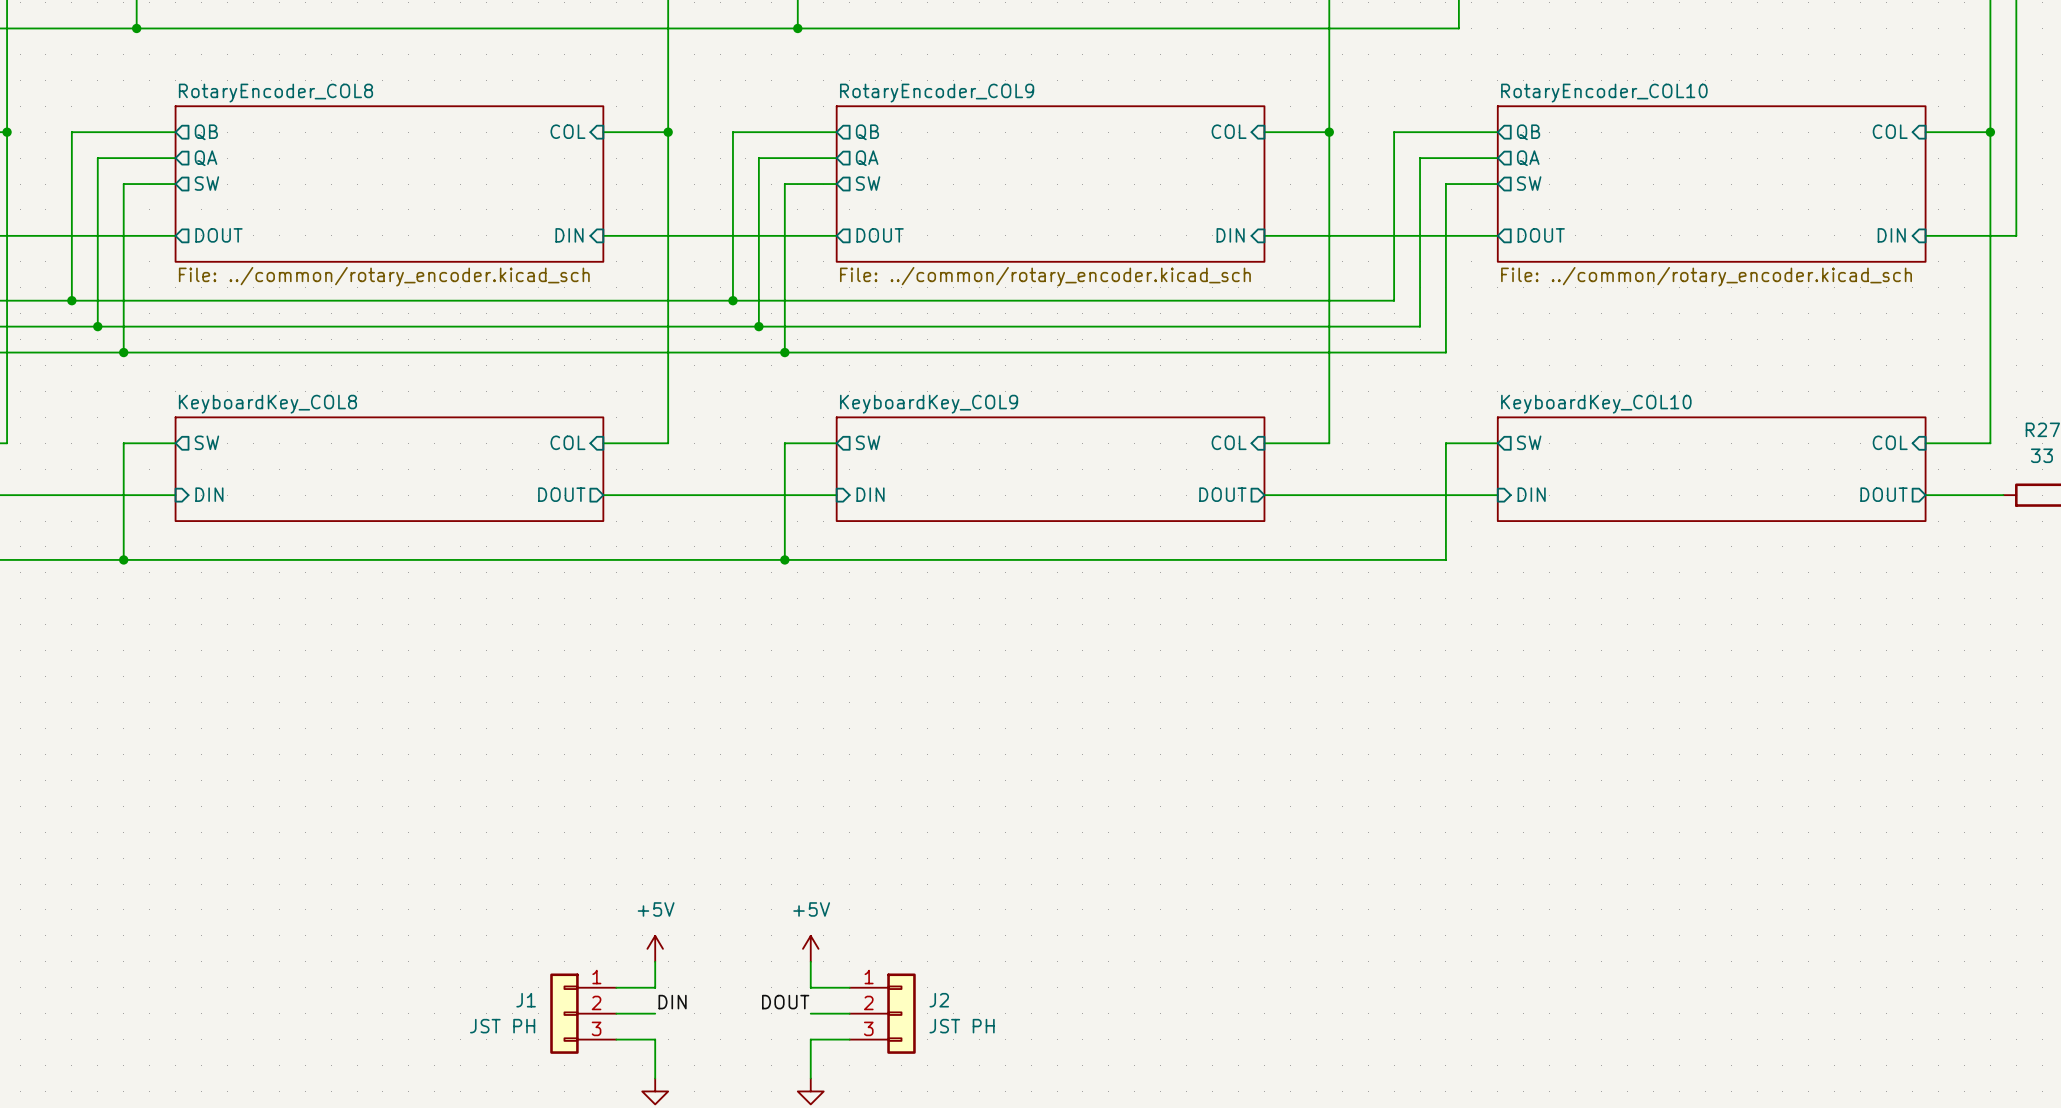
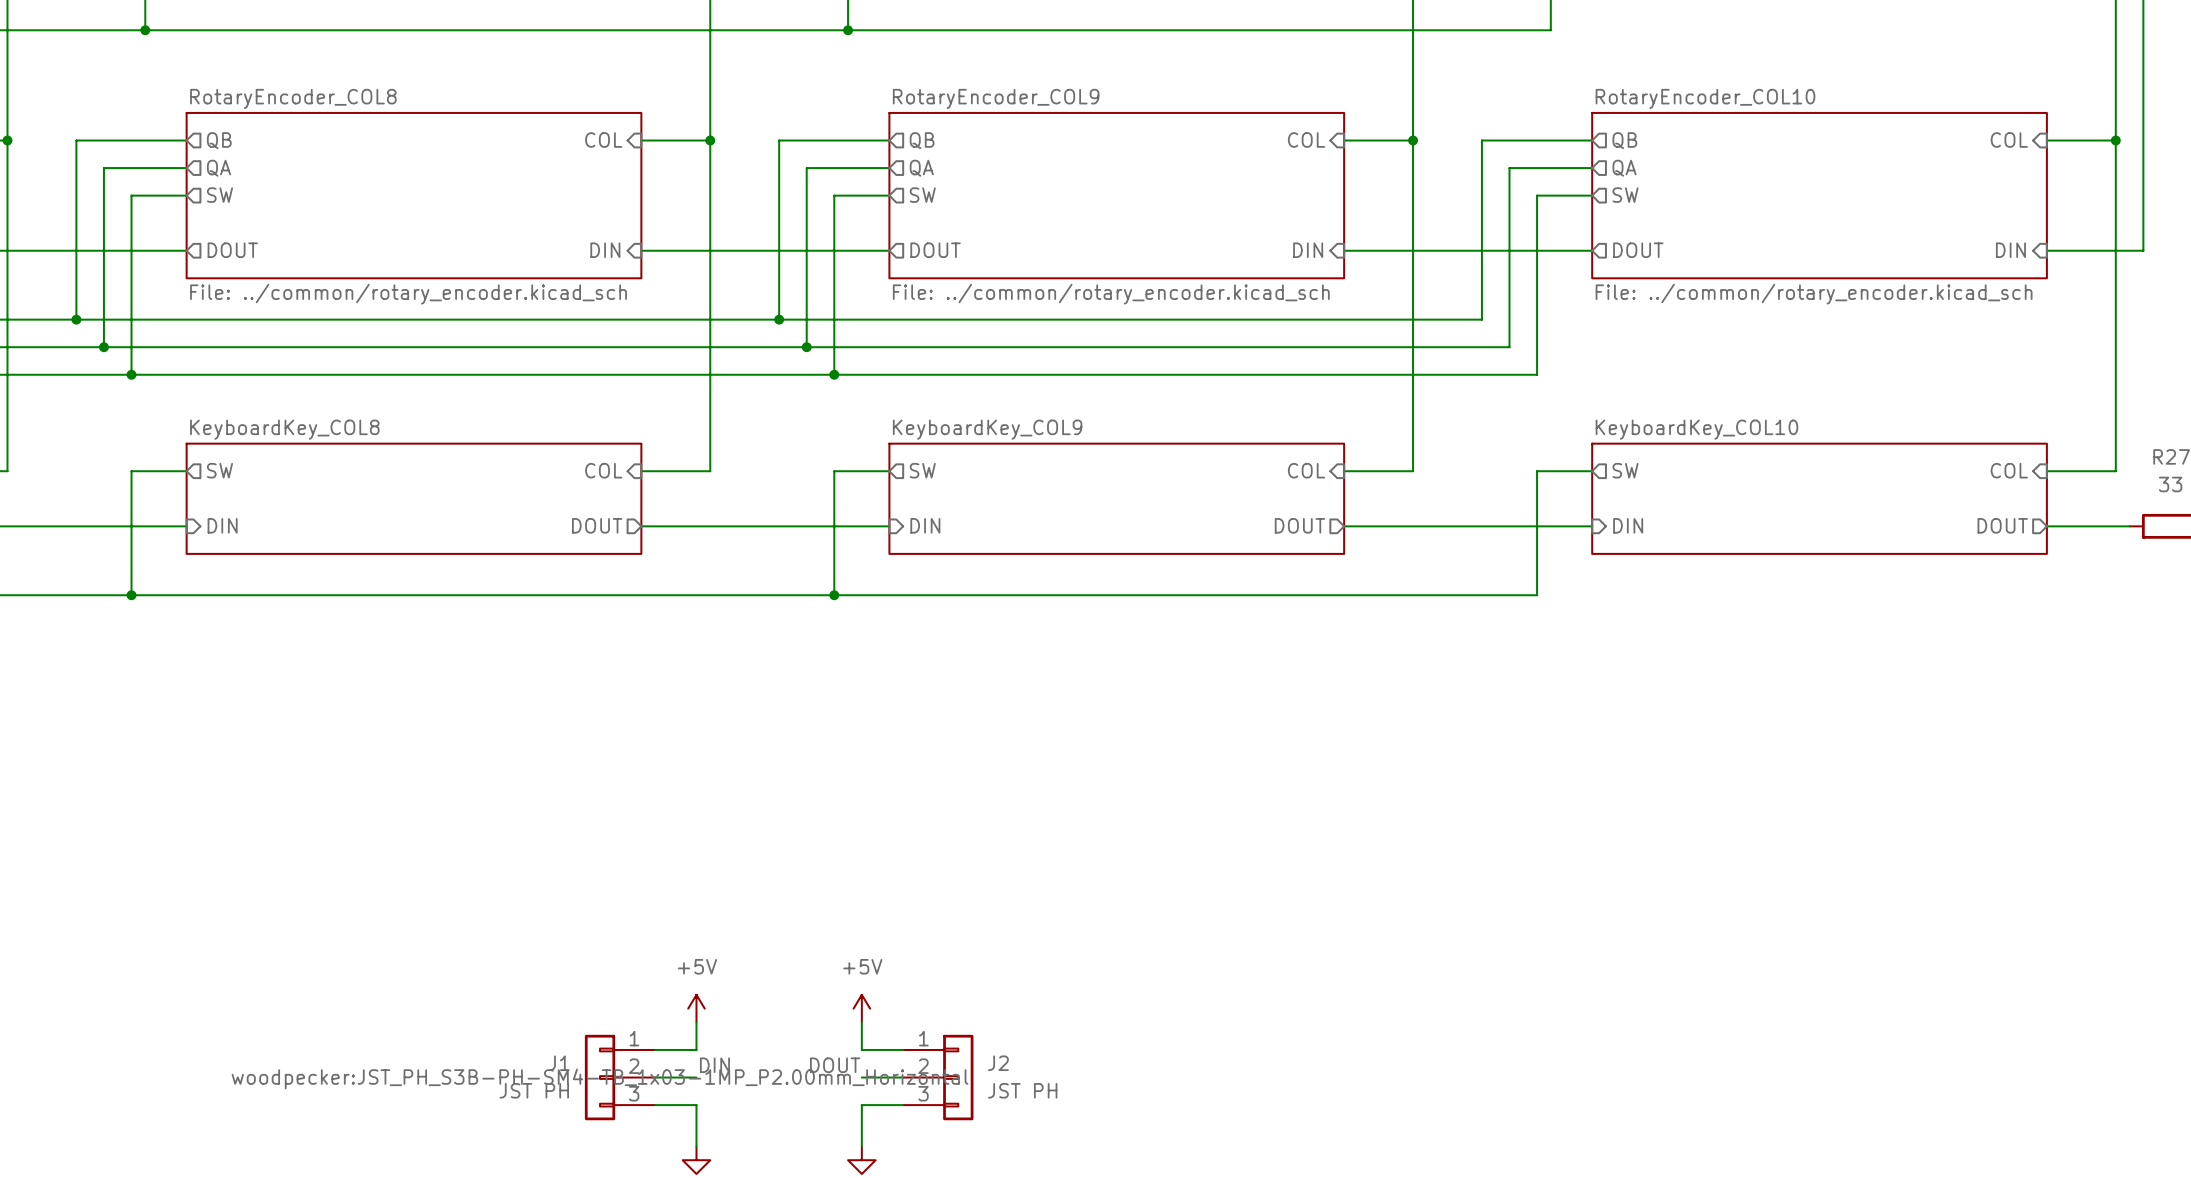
J1 text: none -> woodpecker:JST_PH_S3B-PH-SM4-TB_1x03-1MP_P2.00mm_Horizontal (600, 1078)

